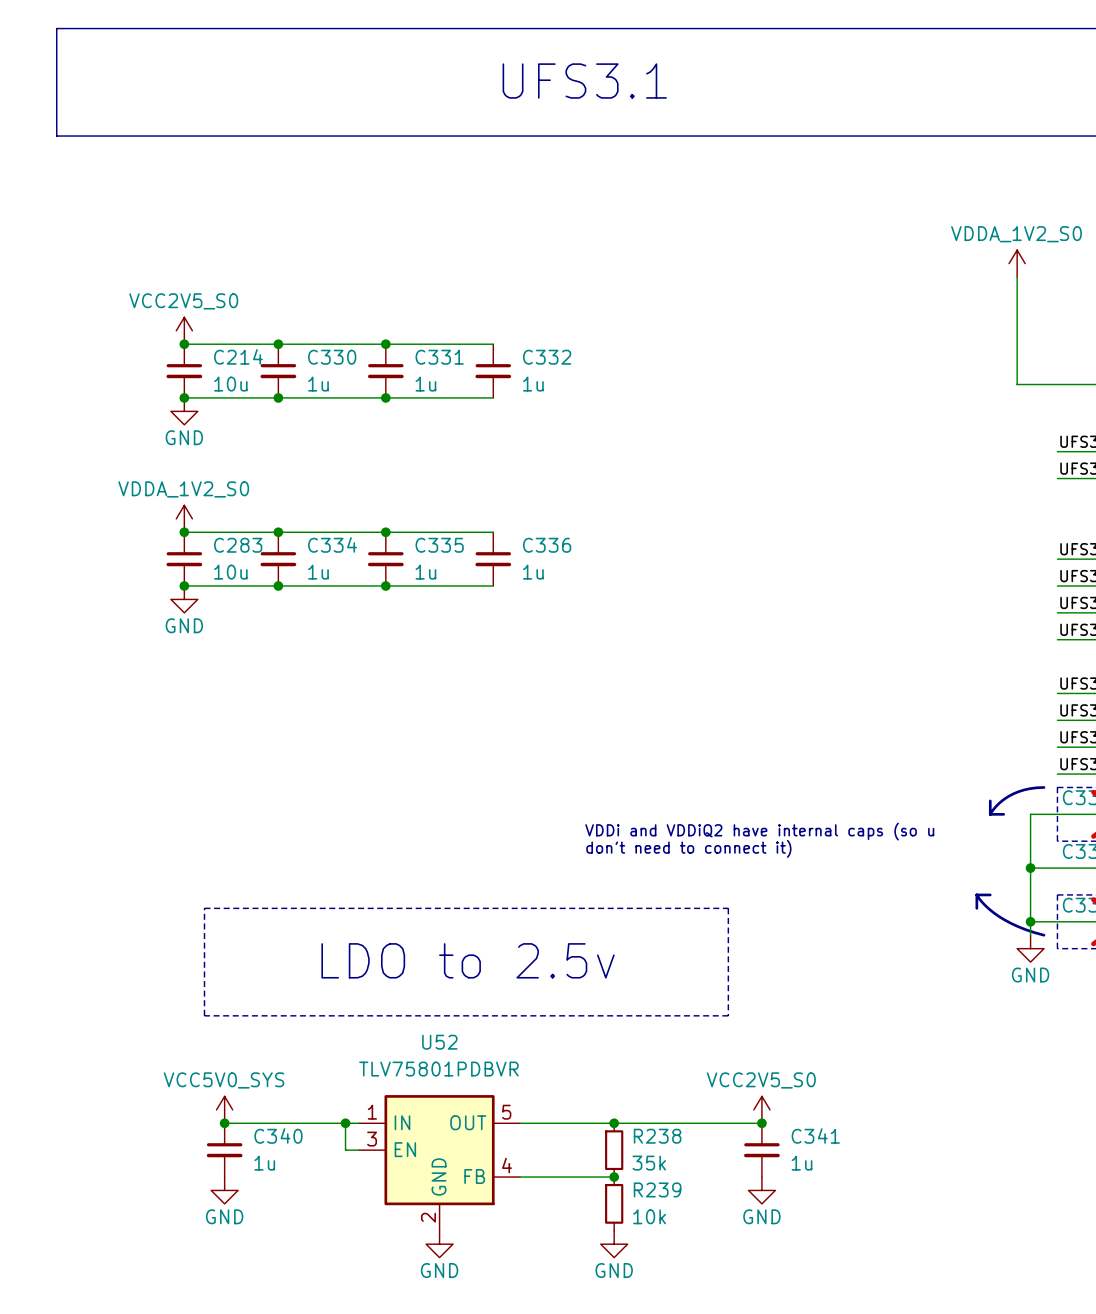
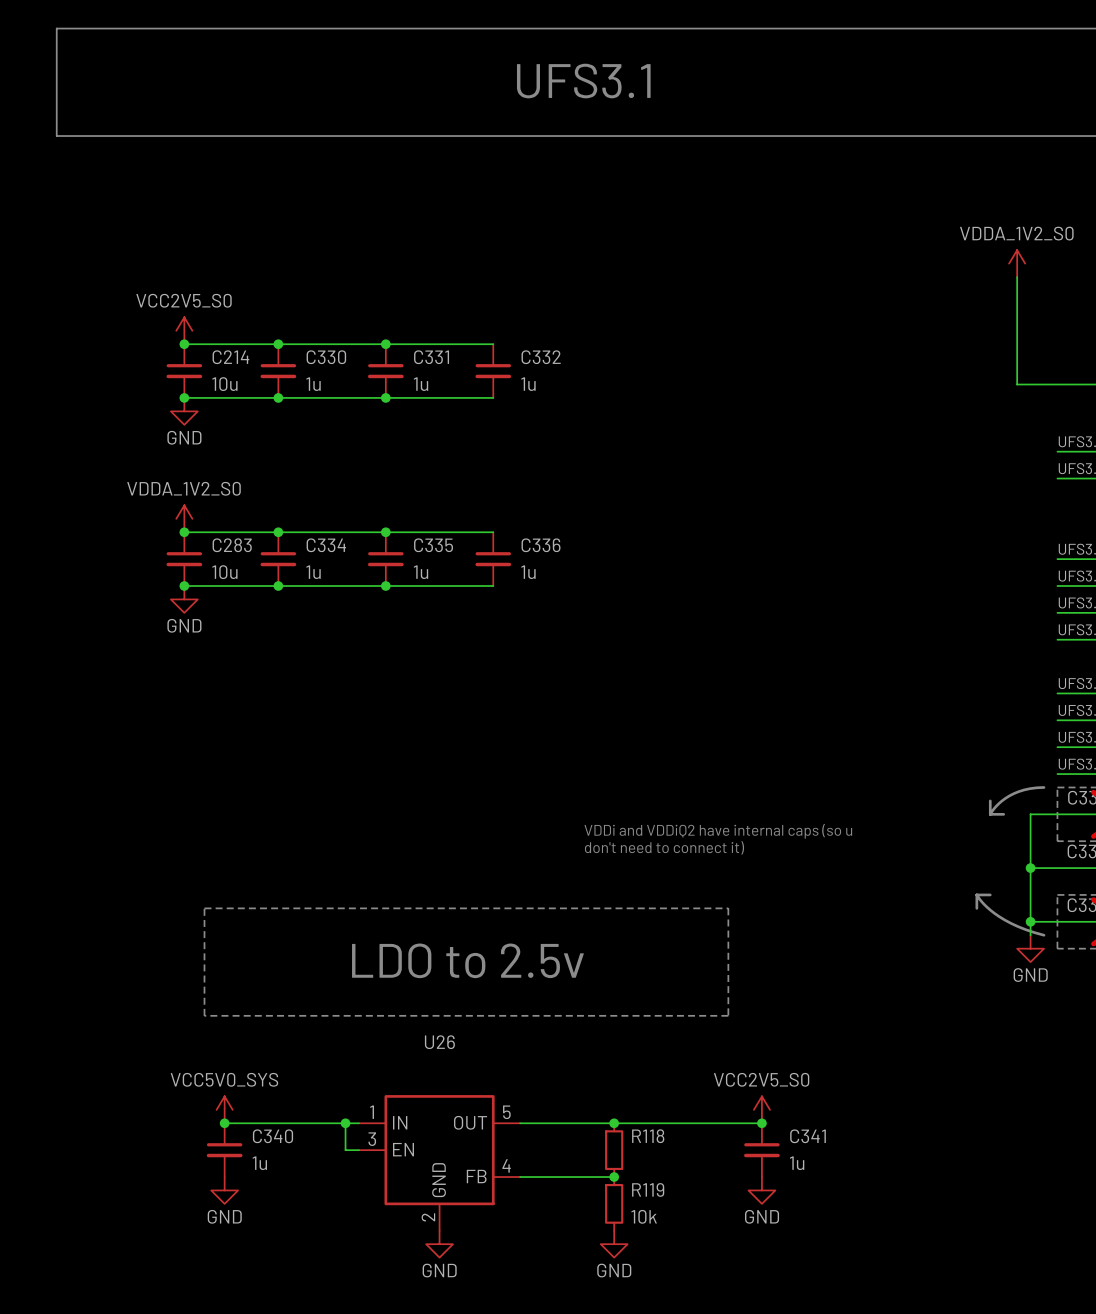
U52 name: U52 (439, 1042) -> U26 (439, 1042)
U52 value: TLV75801PDBVR (438, 1069) -> none
R238 name: R238 (657, 1136) -> R118 (648, 1136)
R238 value: 35k (649, 1163) -> none
R239 name: R239 (657, 1189) -> R119 (648, 1189)

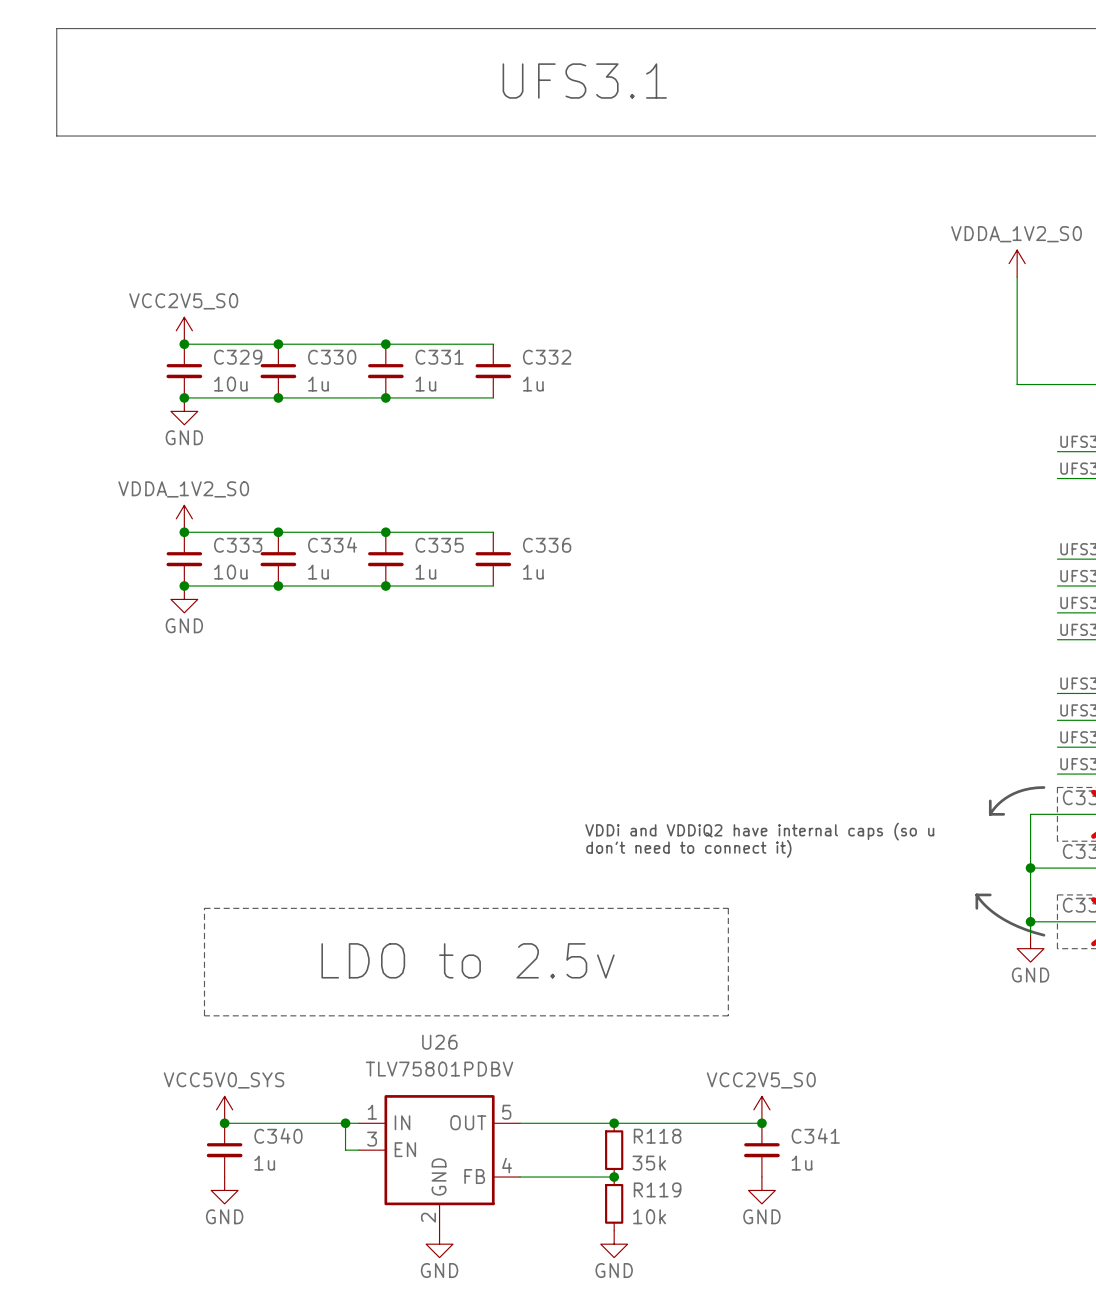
C214 name: C214 (230, 357) -> C329 (238, 357)
C283 name: C283 (232, 545) -> C333 (238, 545)
U26 value: none -> TLV75801PDBV (439, 1069)
R118 value: none -> 35k (649, 1163)

